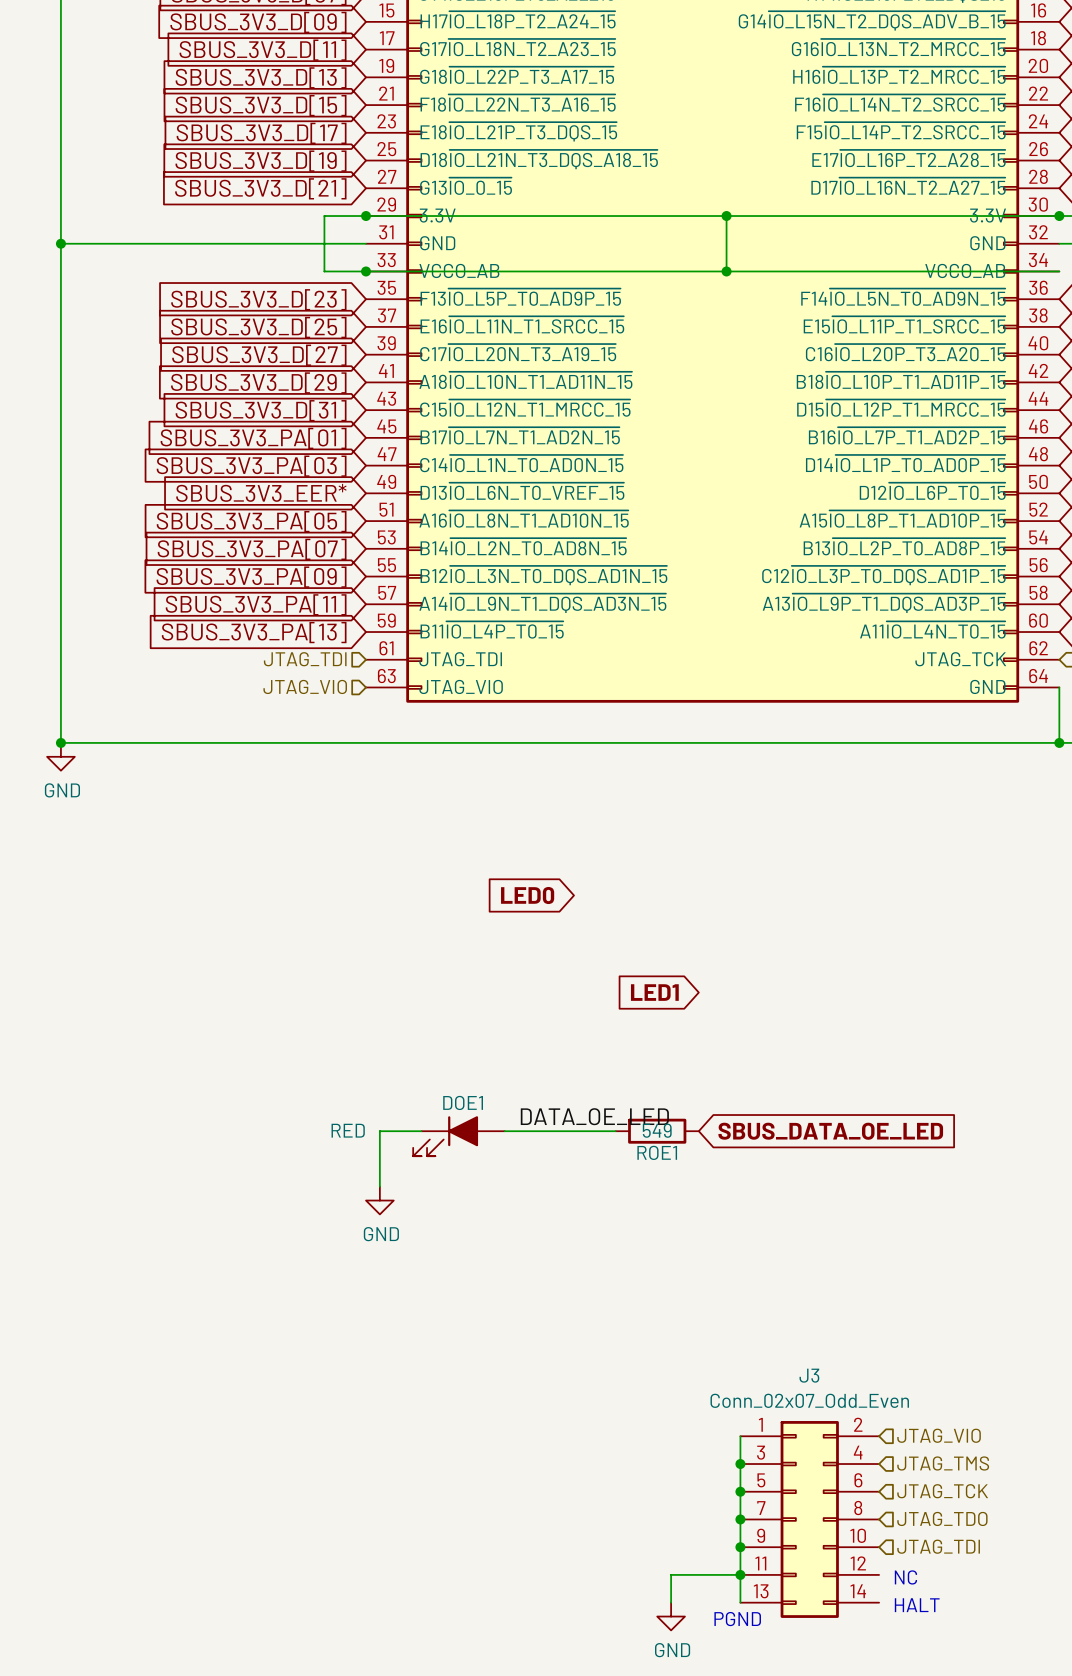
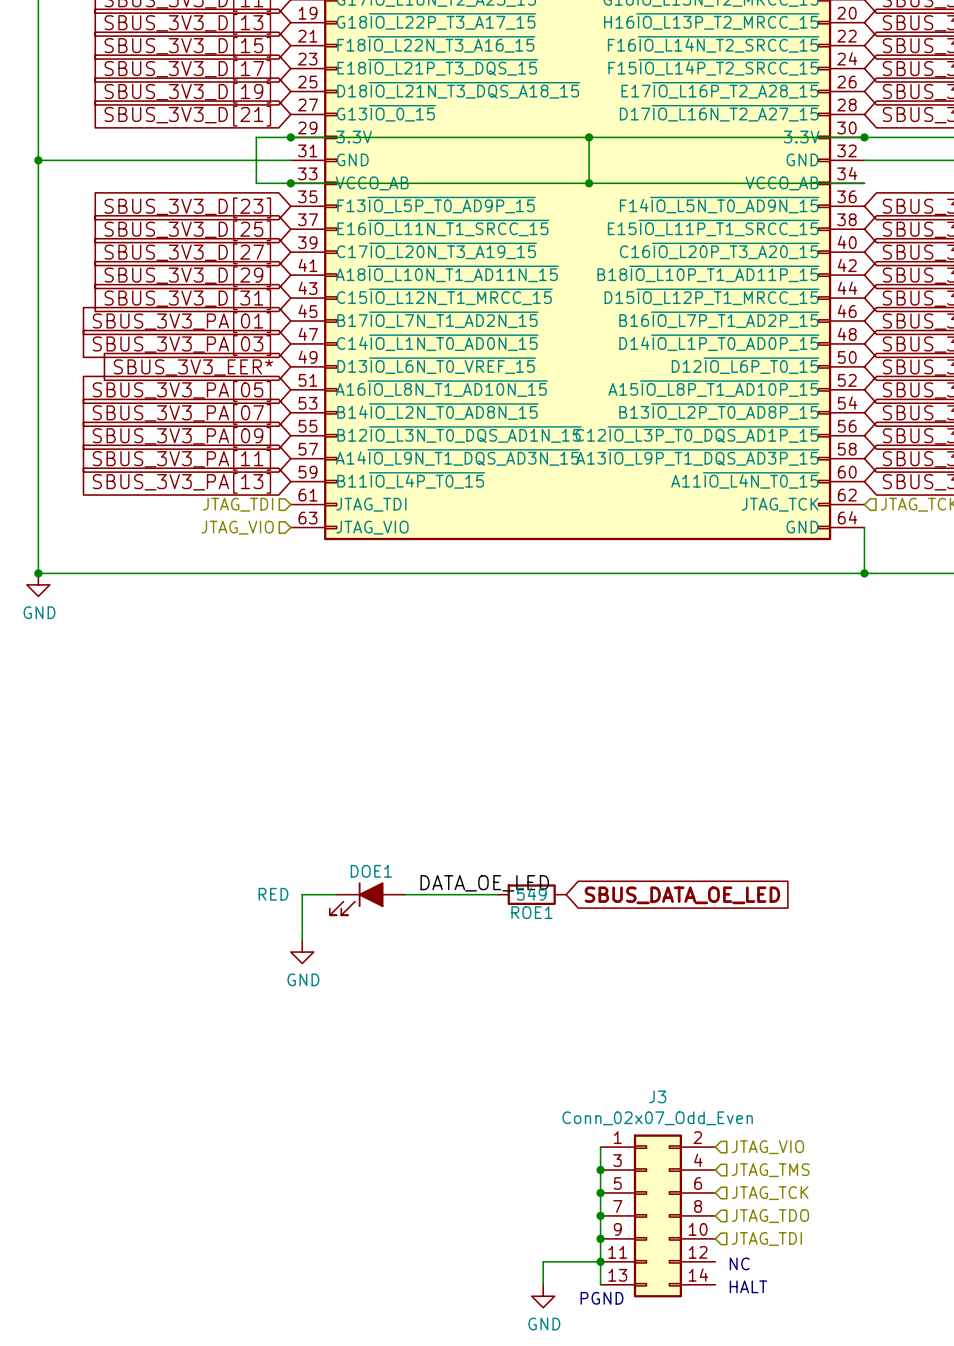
global label: LED0 (527, 895) -> none
global label: LED1 (654, 992) -> none

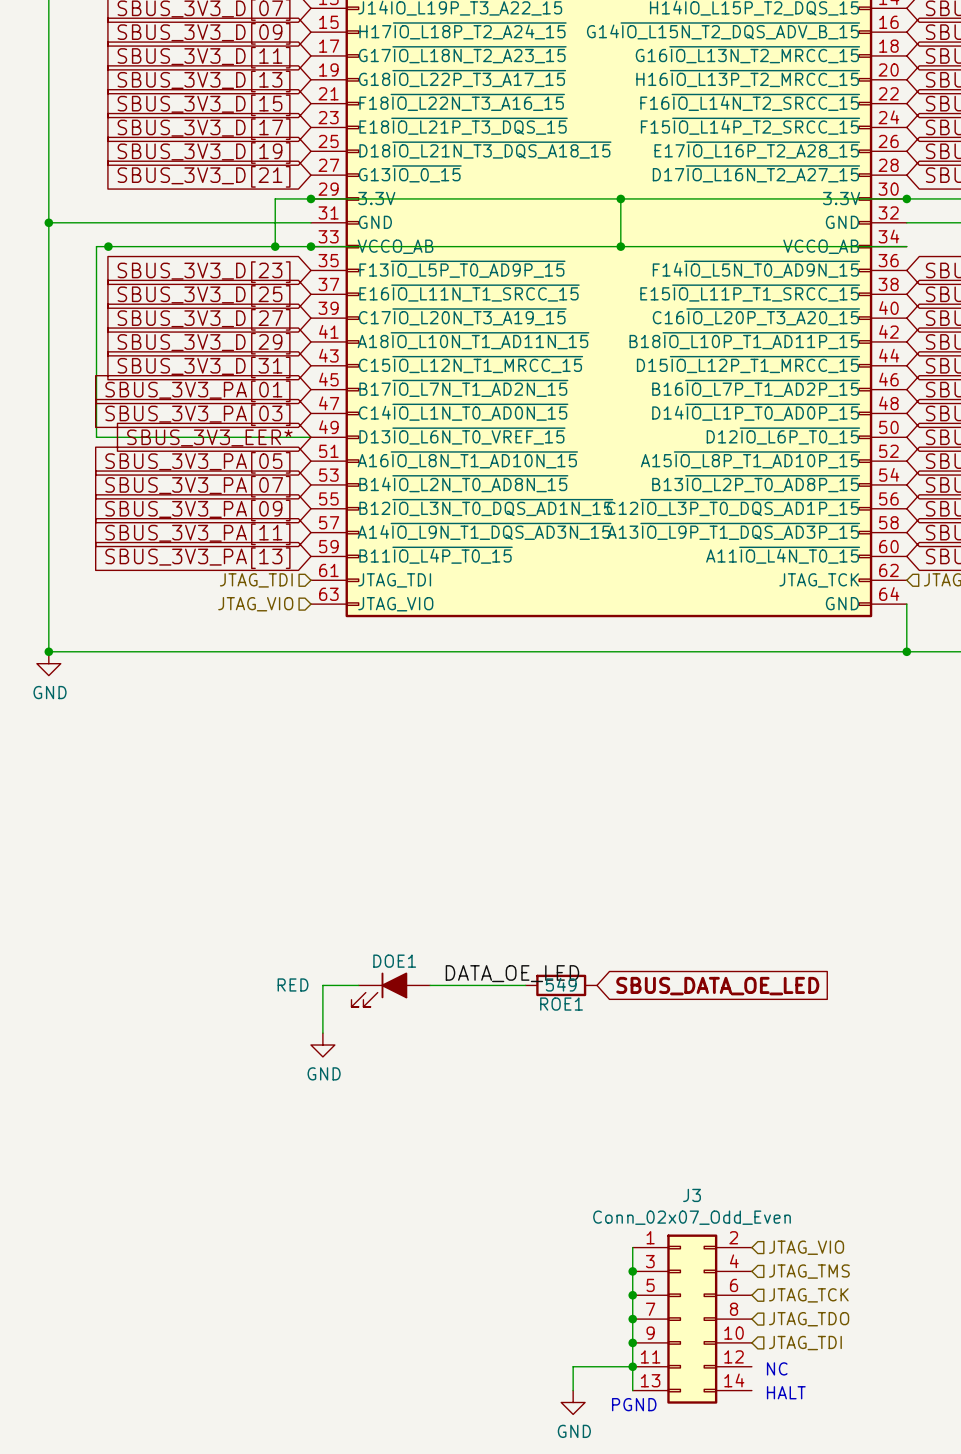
junction: none -> (108, 246)
wire: none -> (275, 246) (96, 246) (96, 437) (310, 437)
junction: none -> (275, 246)

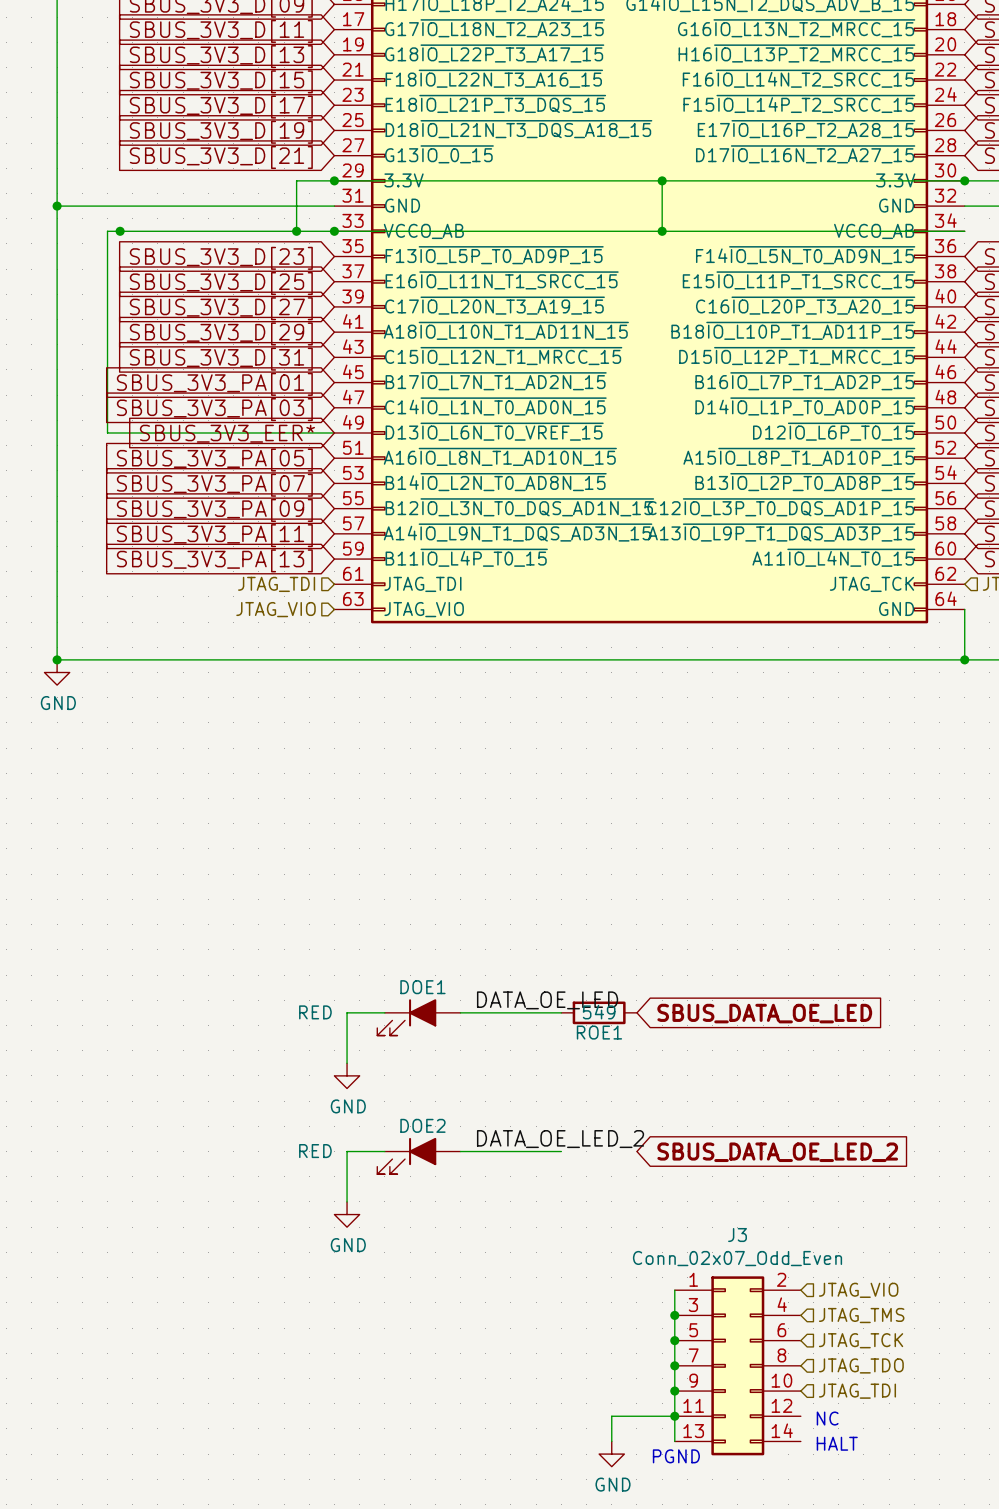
label: none -> DATA_OE_LED_2 (560, 1139)
wire: none -> (384, 1151) (347, 1151) (347, 1201)
wire: none -> (460, 1151) (561, 1151)
global label: none -> SBUS_DATA_OE_LED_2 (777, 1152)
DOE2: none -> RED (418, 1156)
power symbol: none -> GND (347, 1214)

